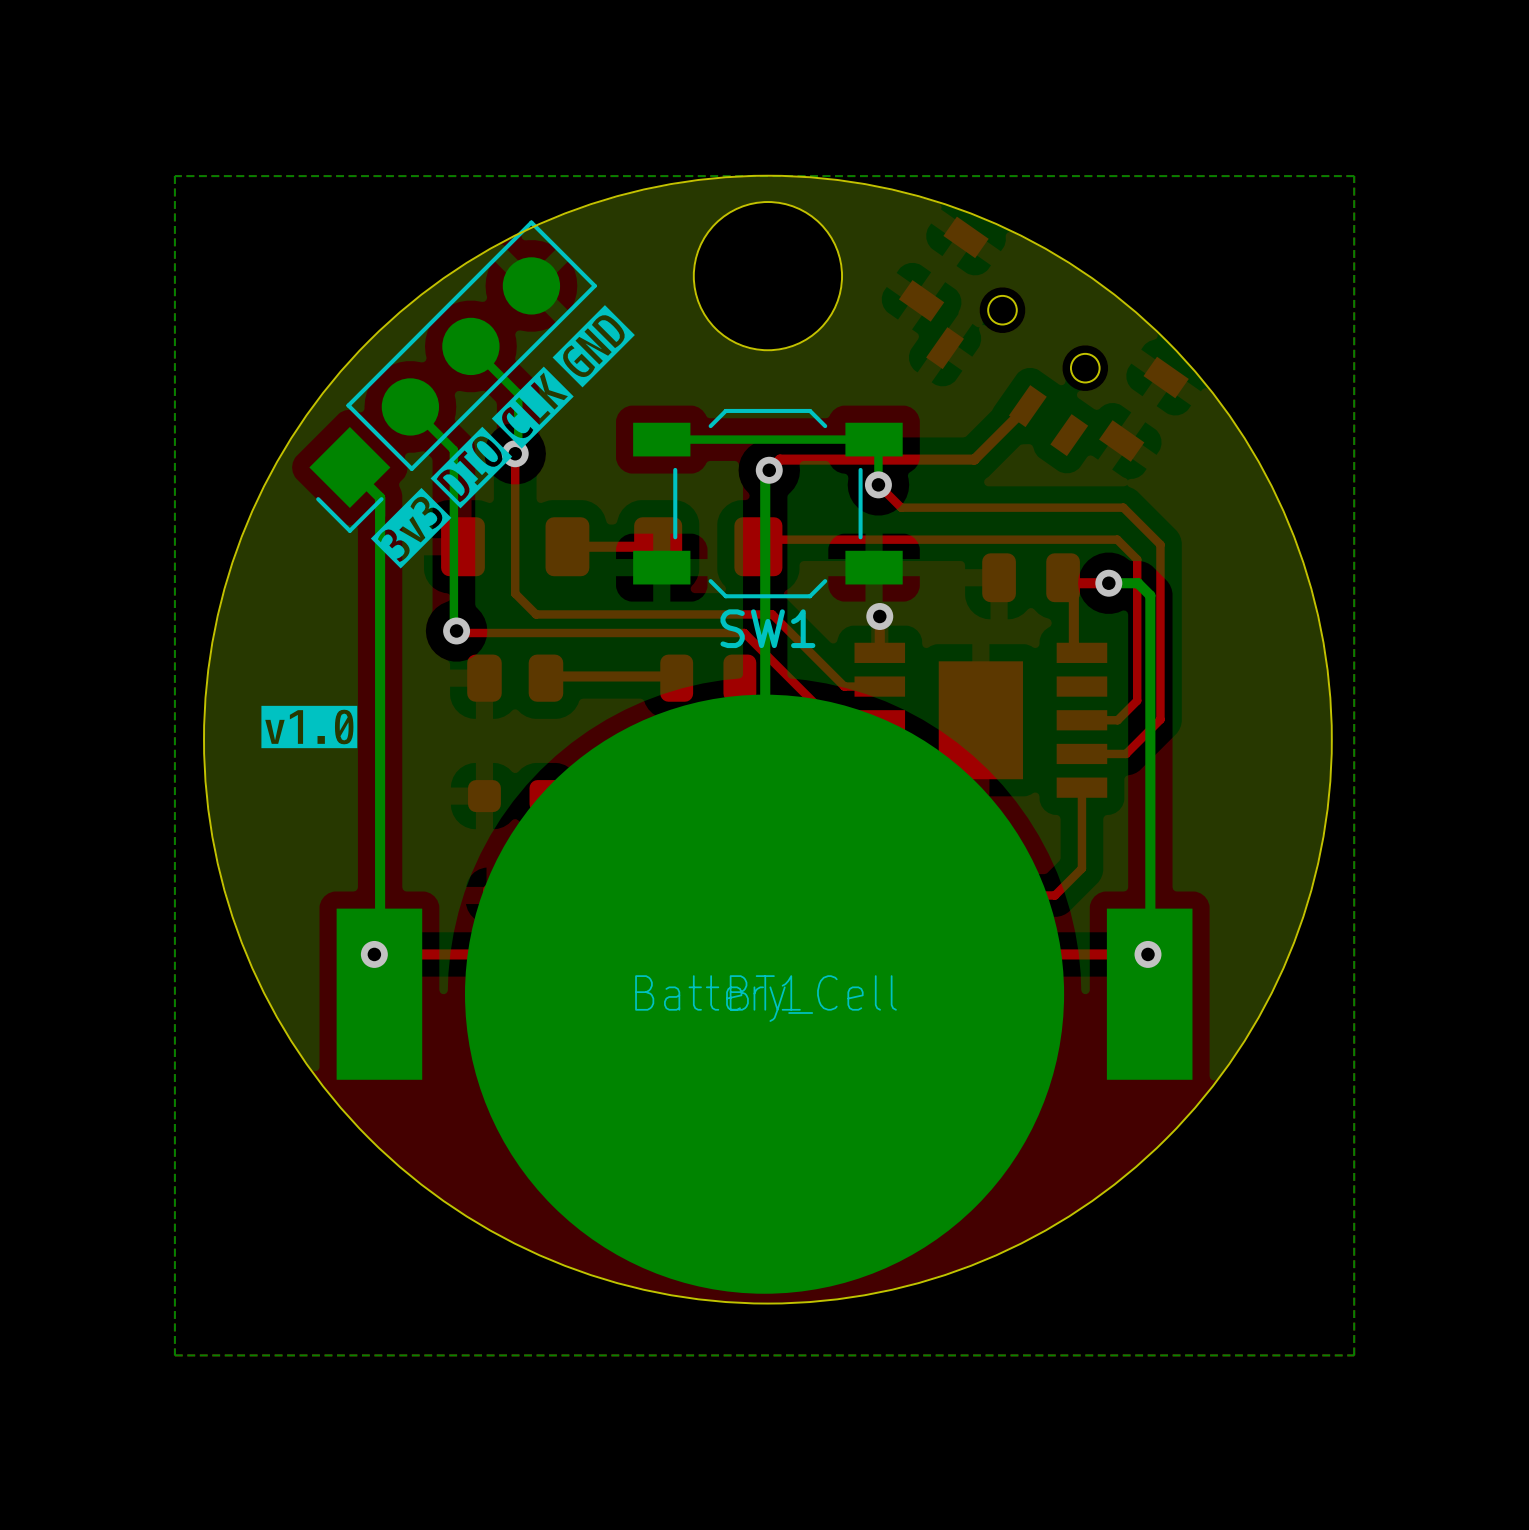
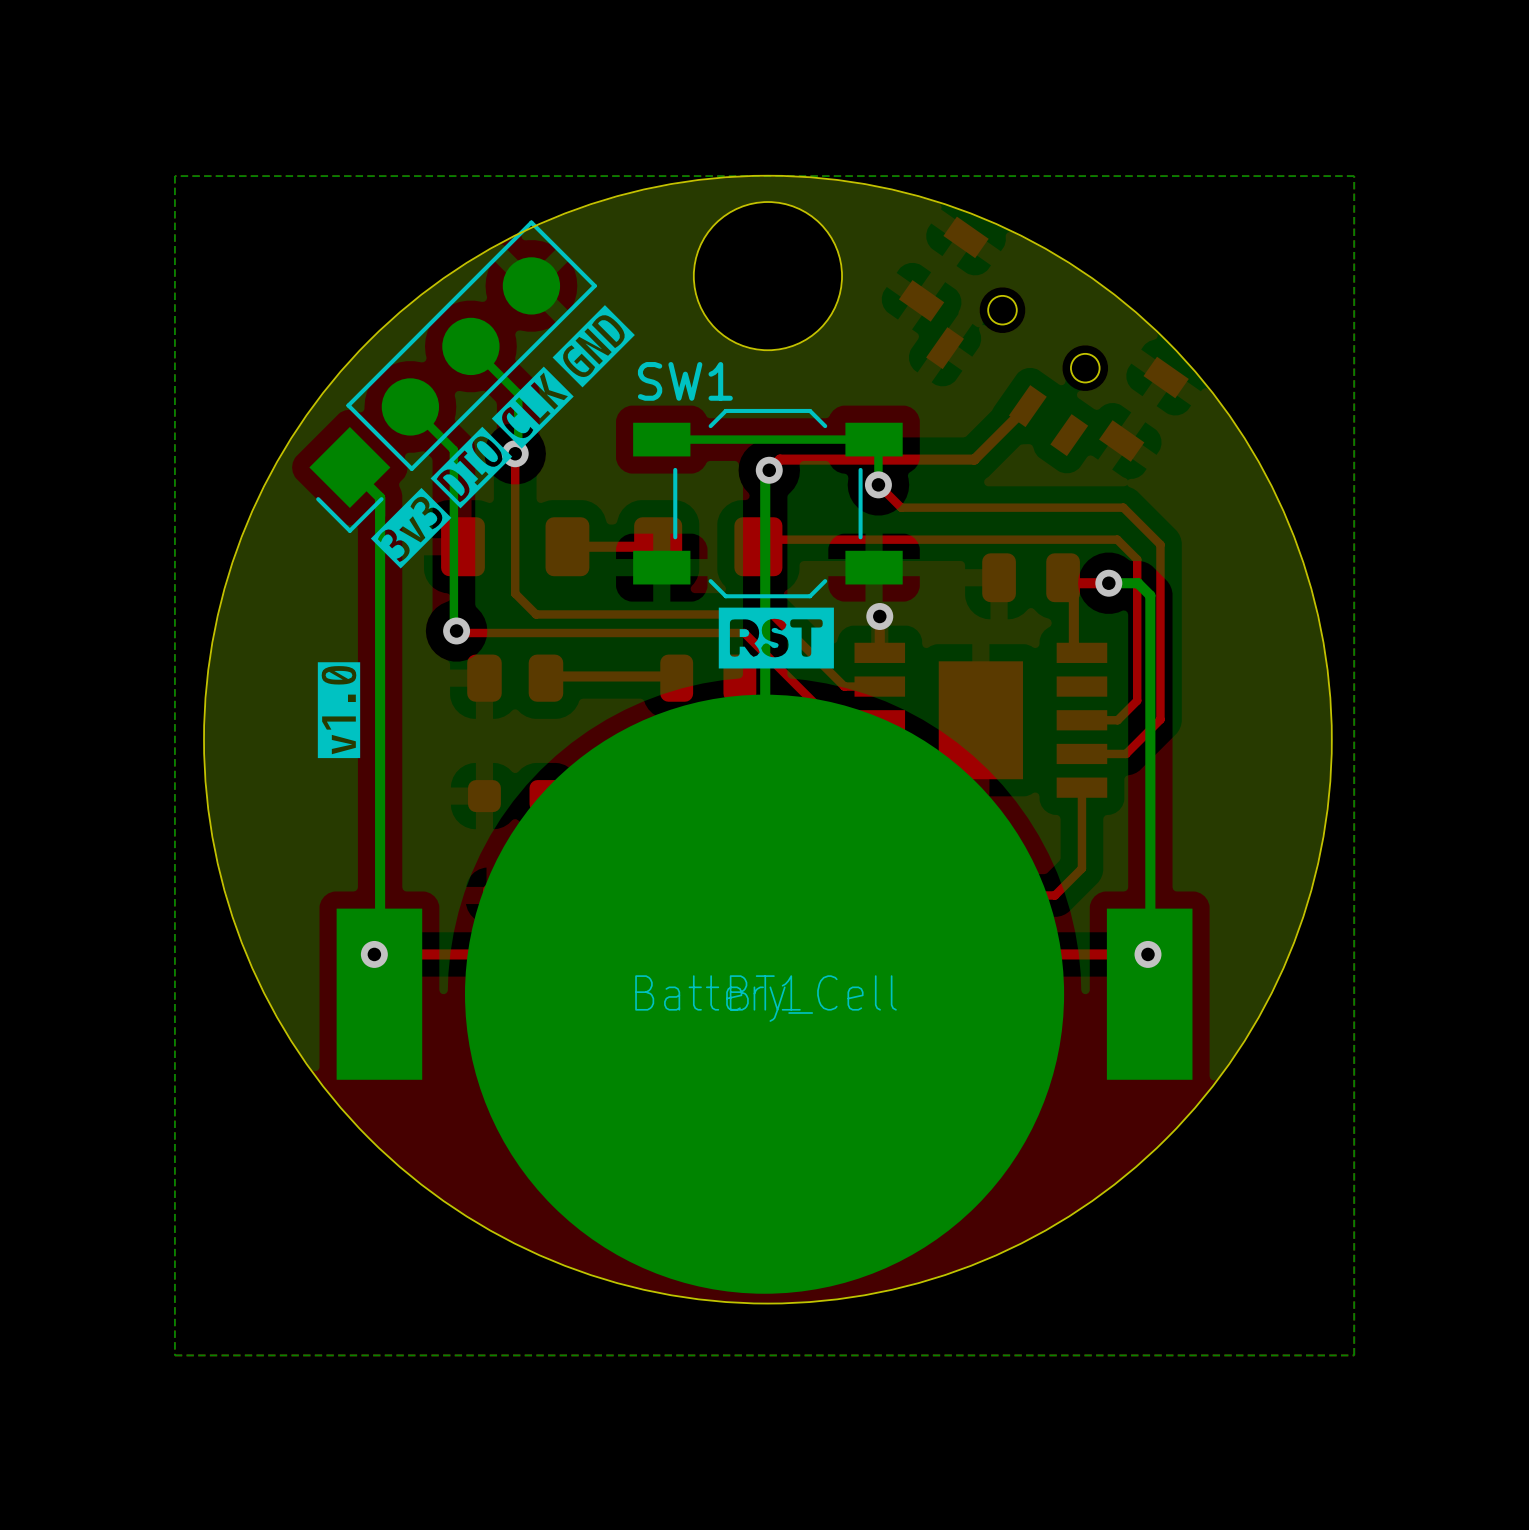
drawing: none -> [718, 607, 834, 669]
SW1 name position: SW1 (767, 628) -> SW1 (685, 381)
drawing: none -> [317, 662, 361, 759]
drawing: [261, 705, 358, 749] -> none

